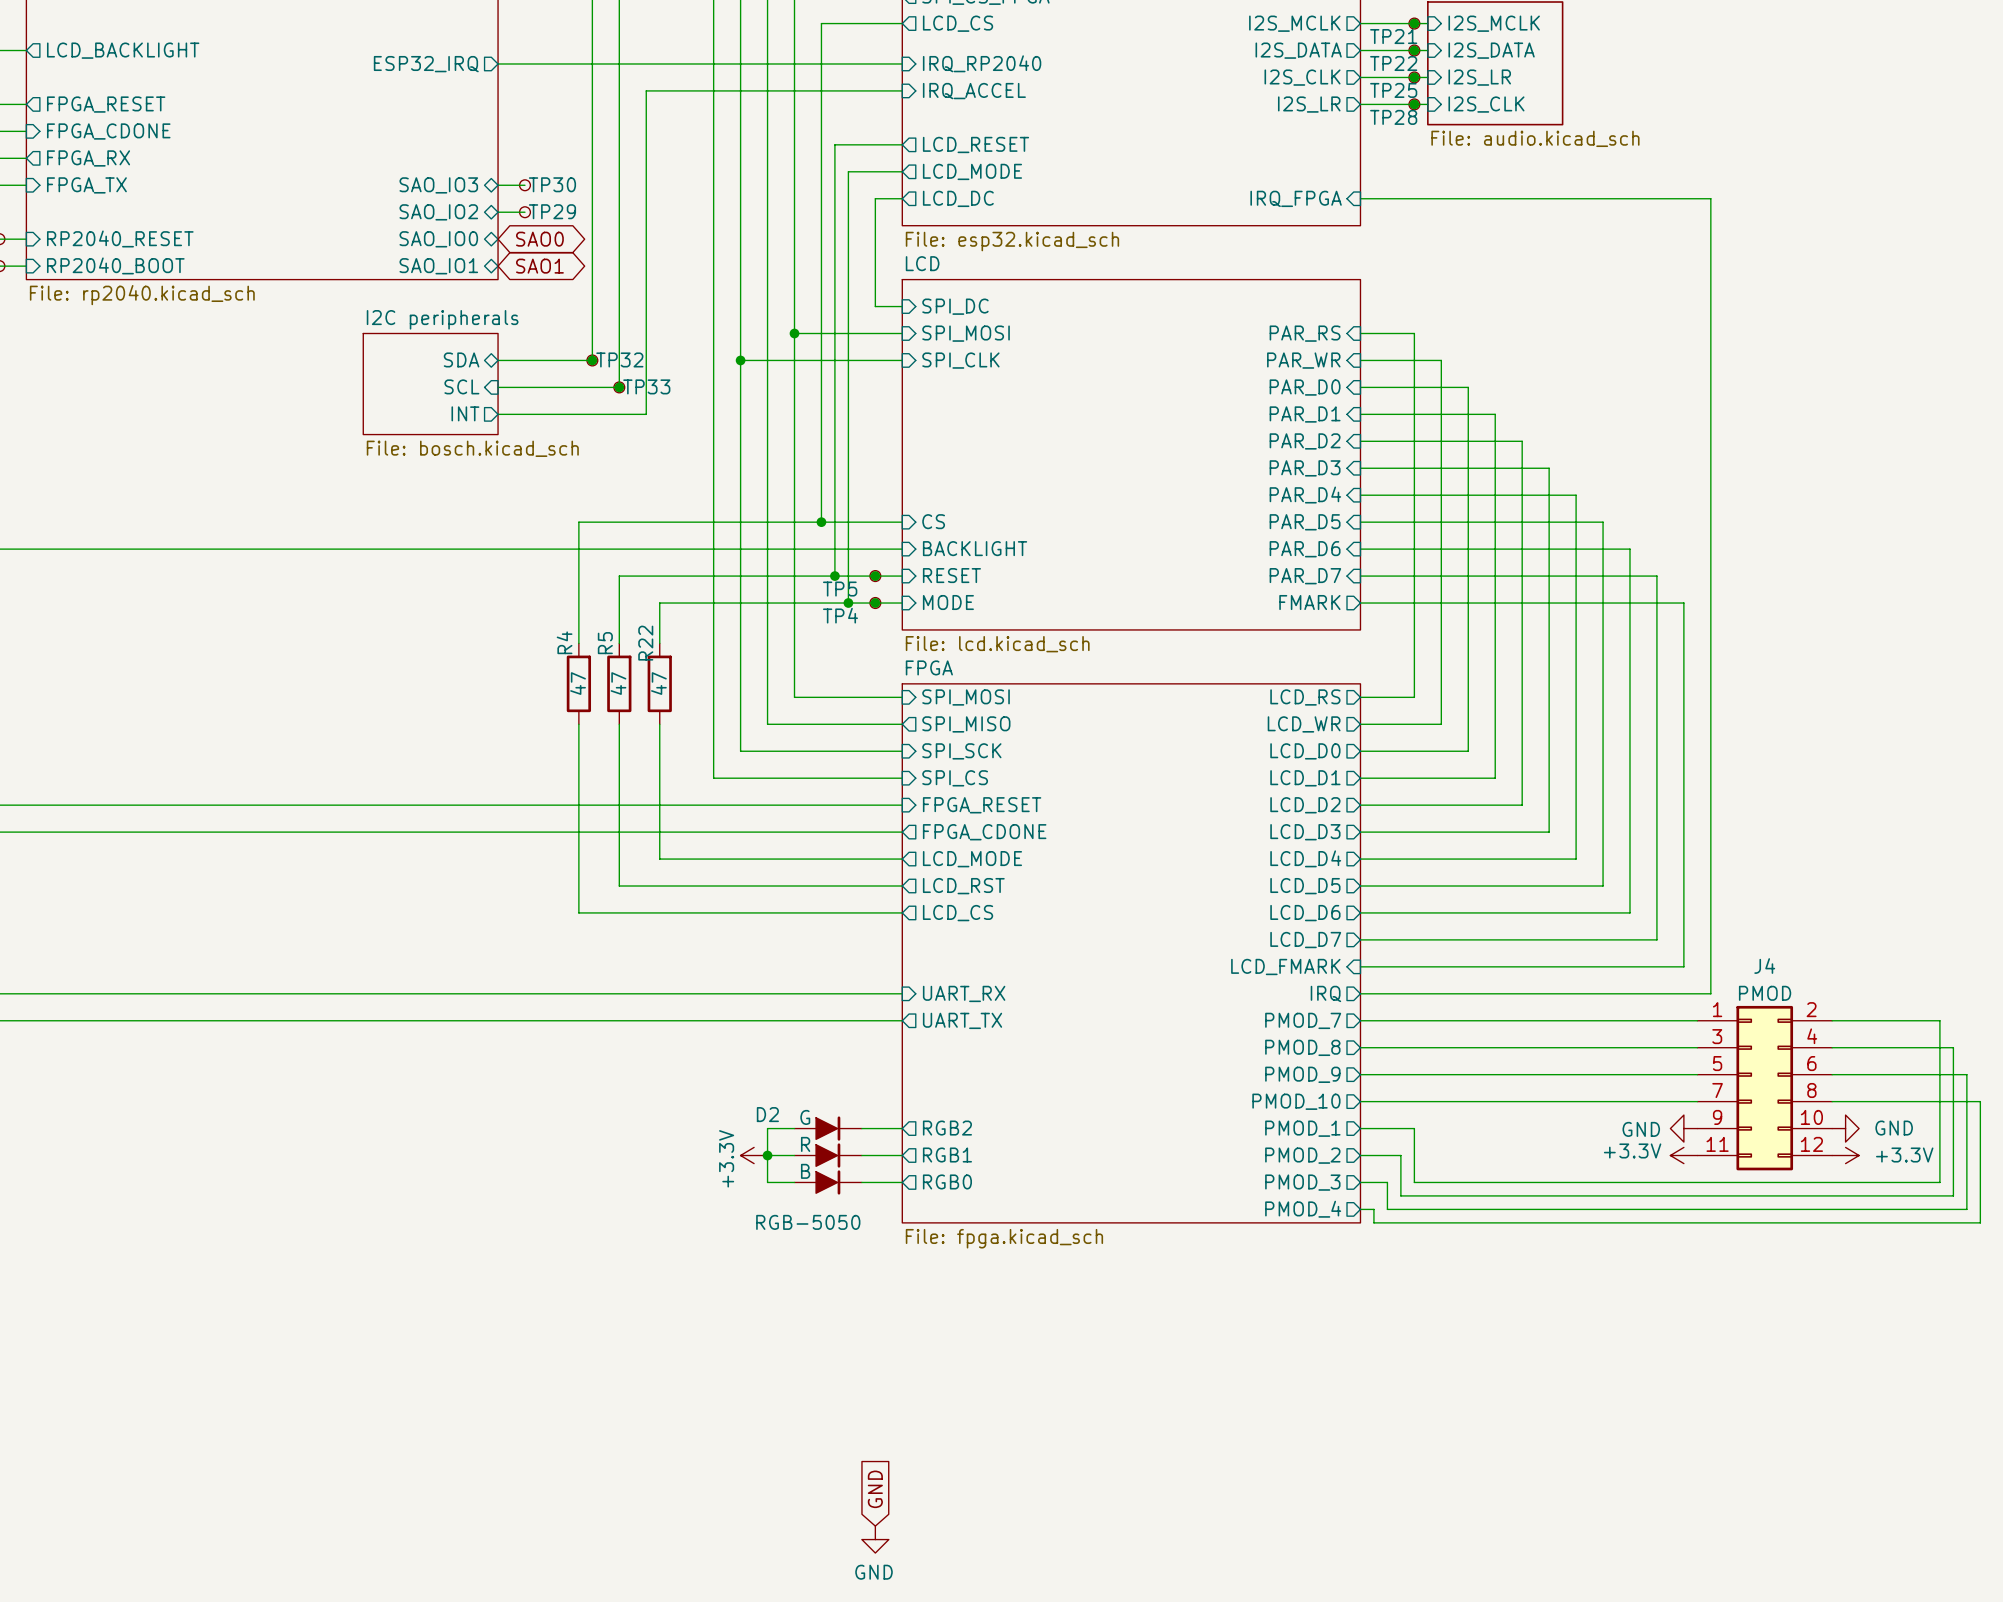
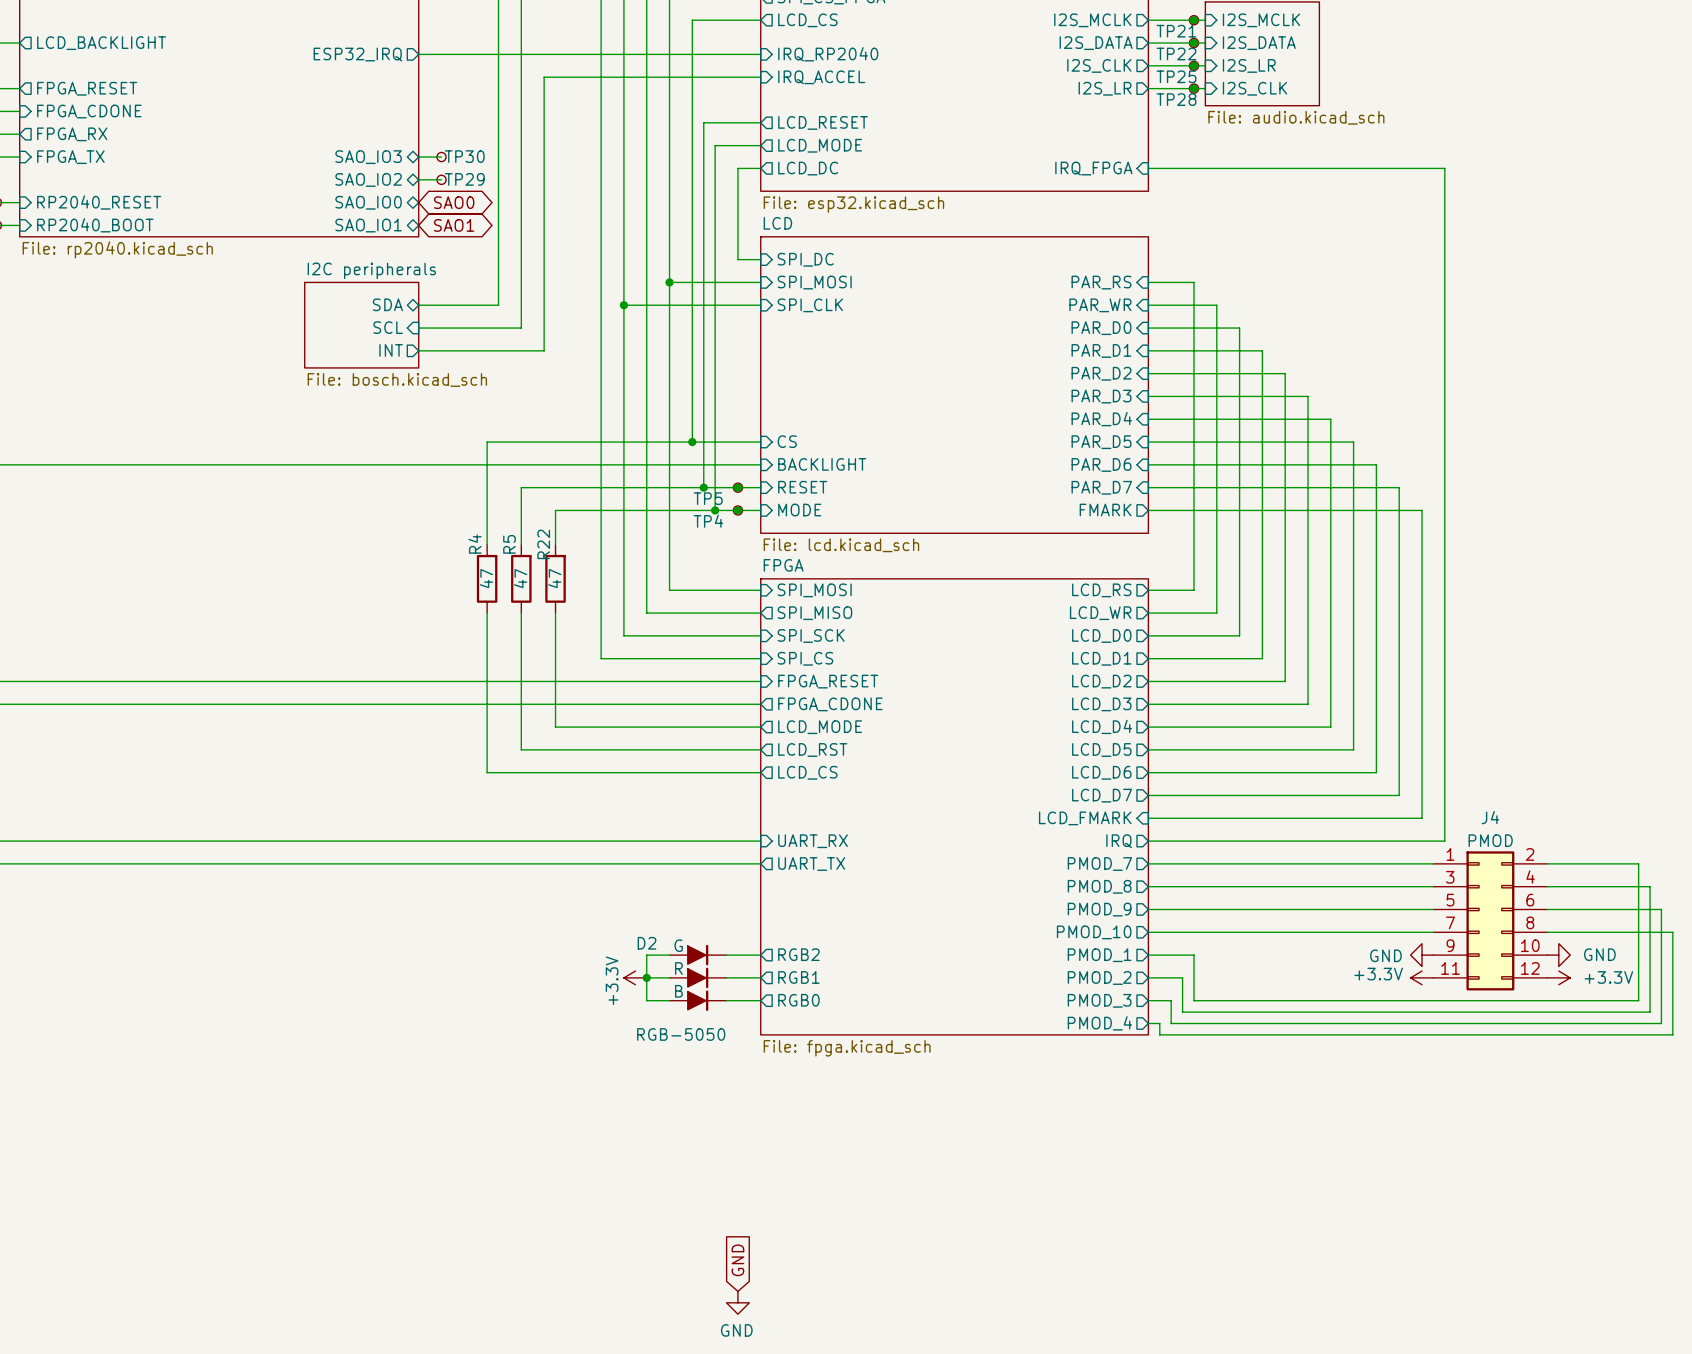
junction: (592, 360) -> none
TP32: (592, 360) -> none
junction: (619, 387) -> none
TP33: (619, 387) -> none

